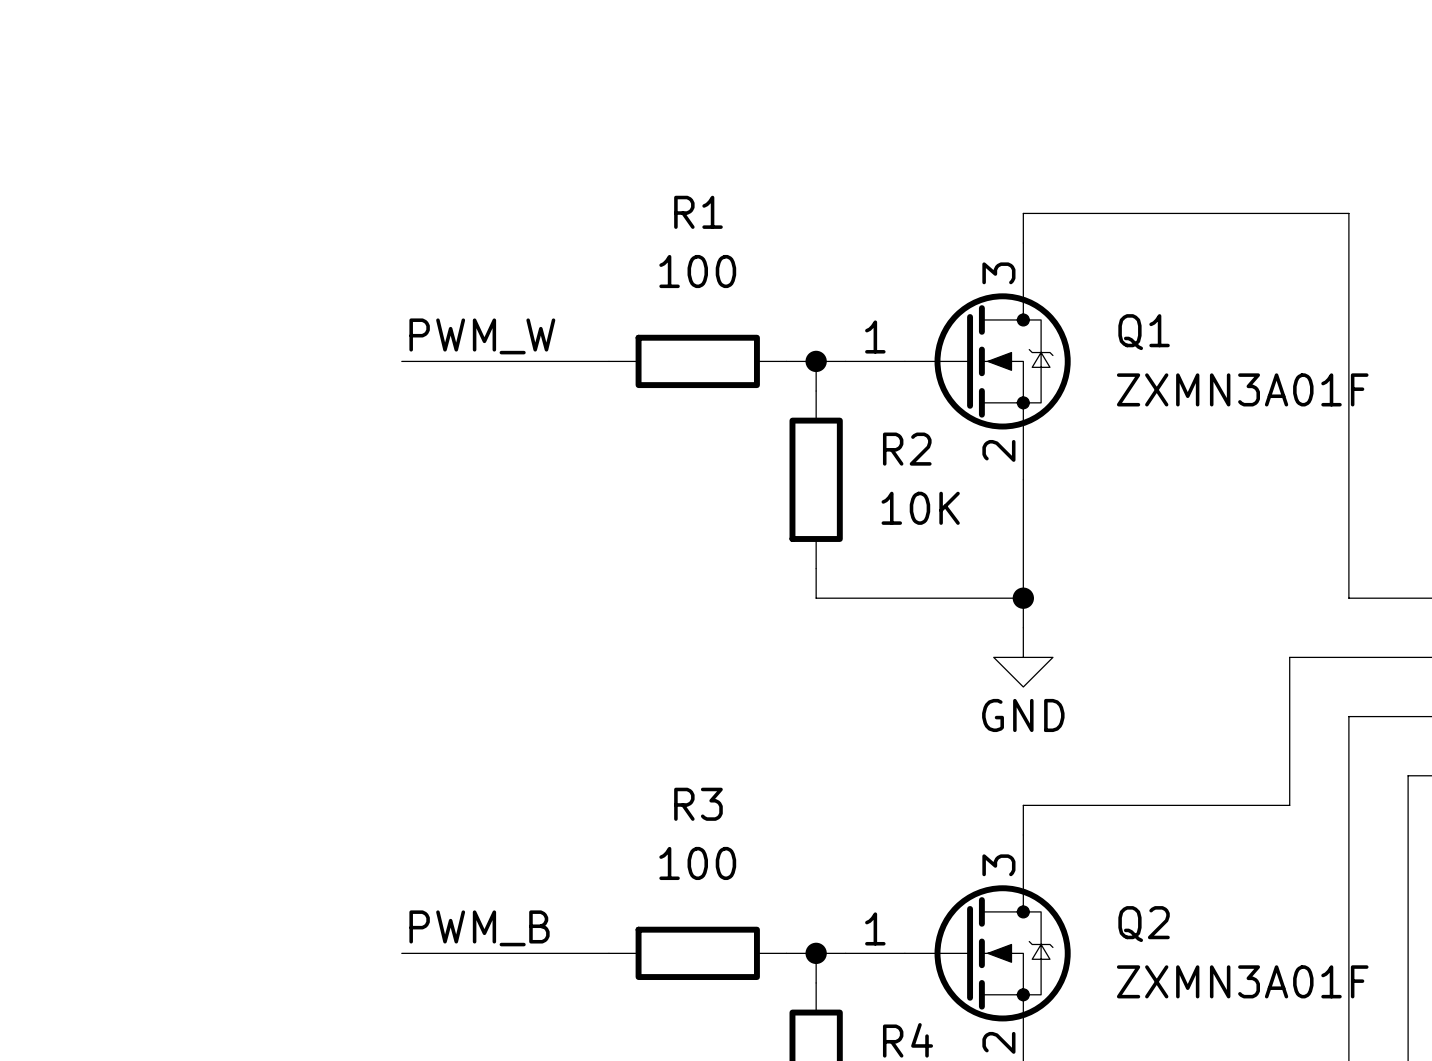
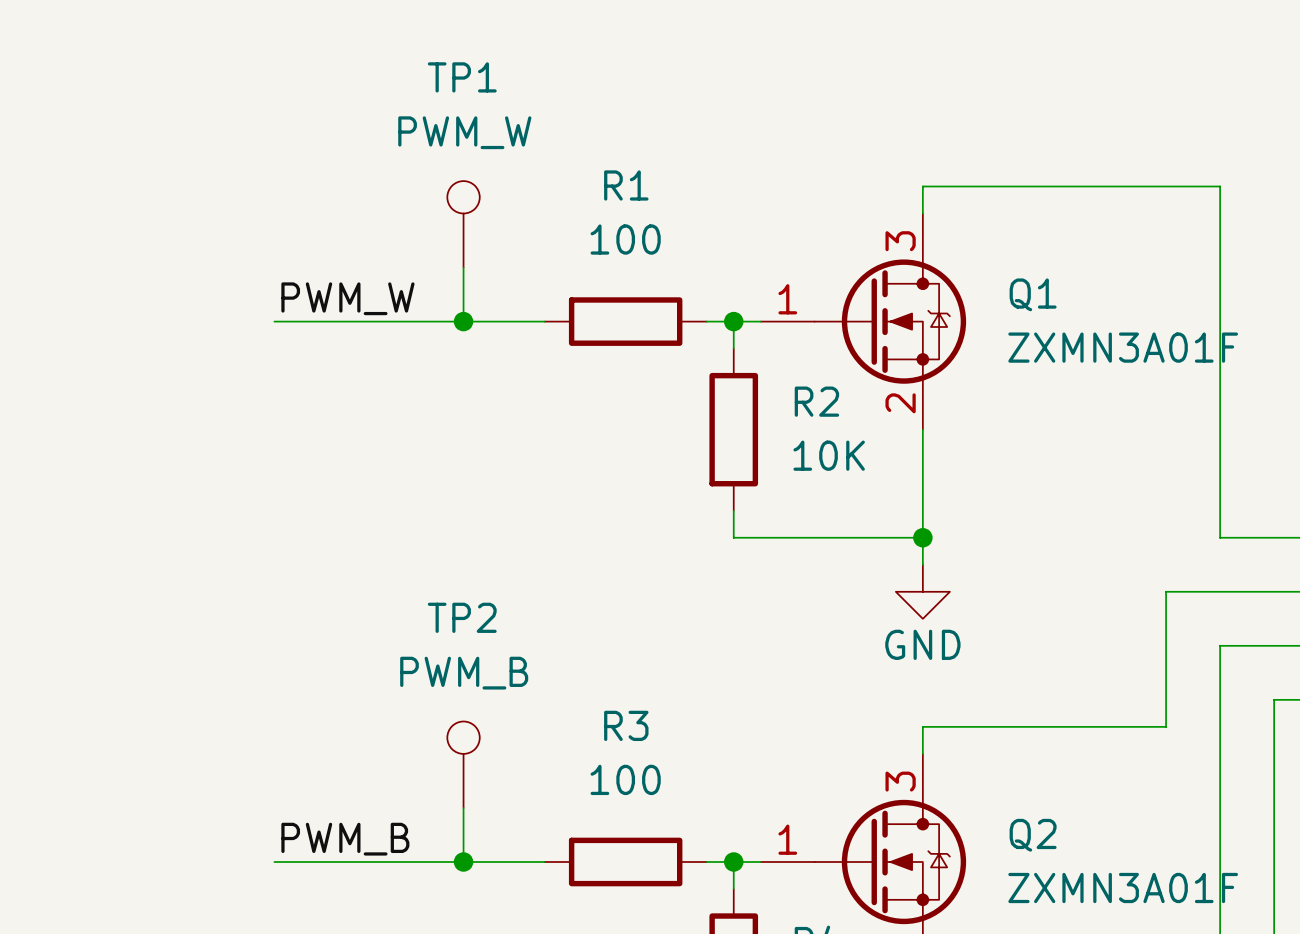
TP1: none -> PWM_W (463, 224)
wire: none -> (463, 267) (463, 321)
label position: PWM_W (482, 336) -> PWM_W (347, 298)
wire: none -> (274, 321) (355, 321)
junction: none -> (463, 321)
TP2: none -> PWM_B (463, 764)
wire: none -> (463, 807) (463, 861)
label position: PWM_B (479, 928) -> PWM_B (345, 839)
wire: none -> (274, 861) (355, 861)
junction: none -> (463, 861)

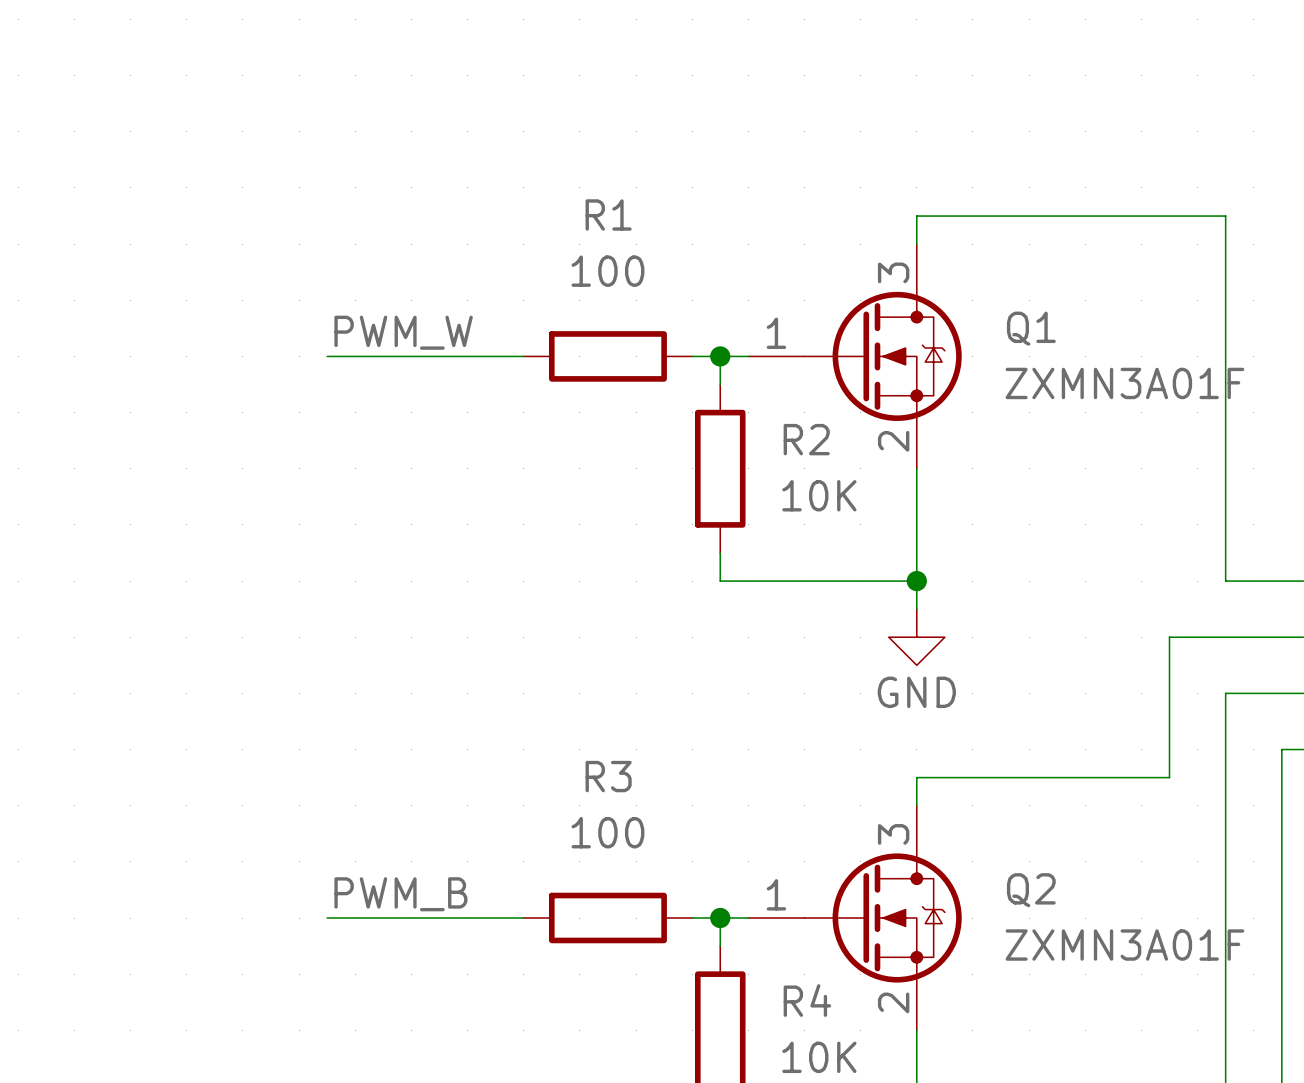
TP1: PWM_W (463, 224) -> none
wire: (463, 267) (463, 321) -> none
label position: PWM_W (347, 298) -> PWM_W (403, 332)
wire: (274, 321) (355, 321) -> none
junction: (463, 321) -> none
TP2: PWM_B (463, 764) -> none
wire: (463, 807) (463, 861) -> none
label position: PWM_B (345, 839) -> PWM_B (400, 894)
wire: (274, 861) (355, 861) -> none
junction: (463, 861) -> none

